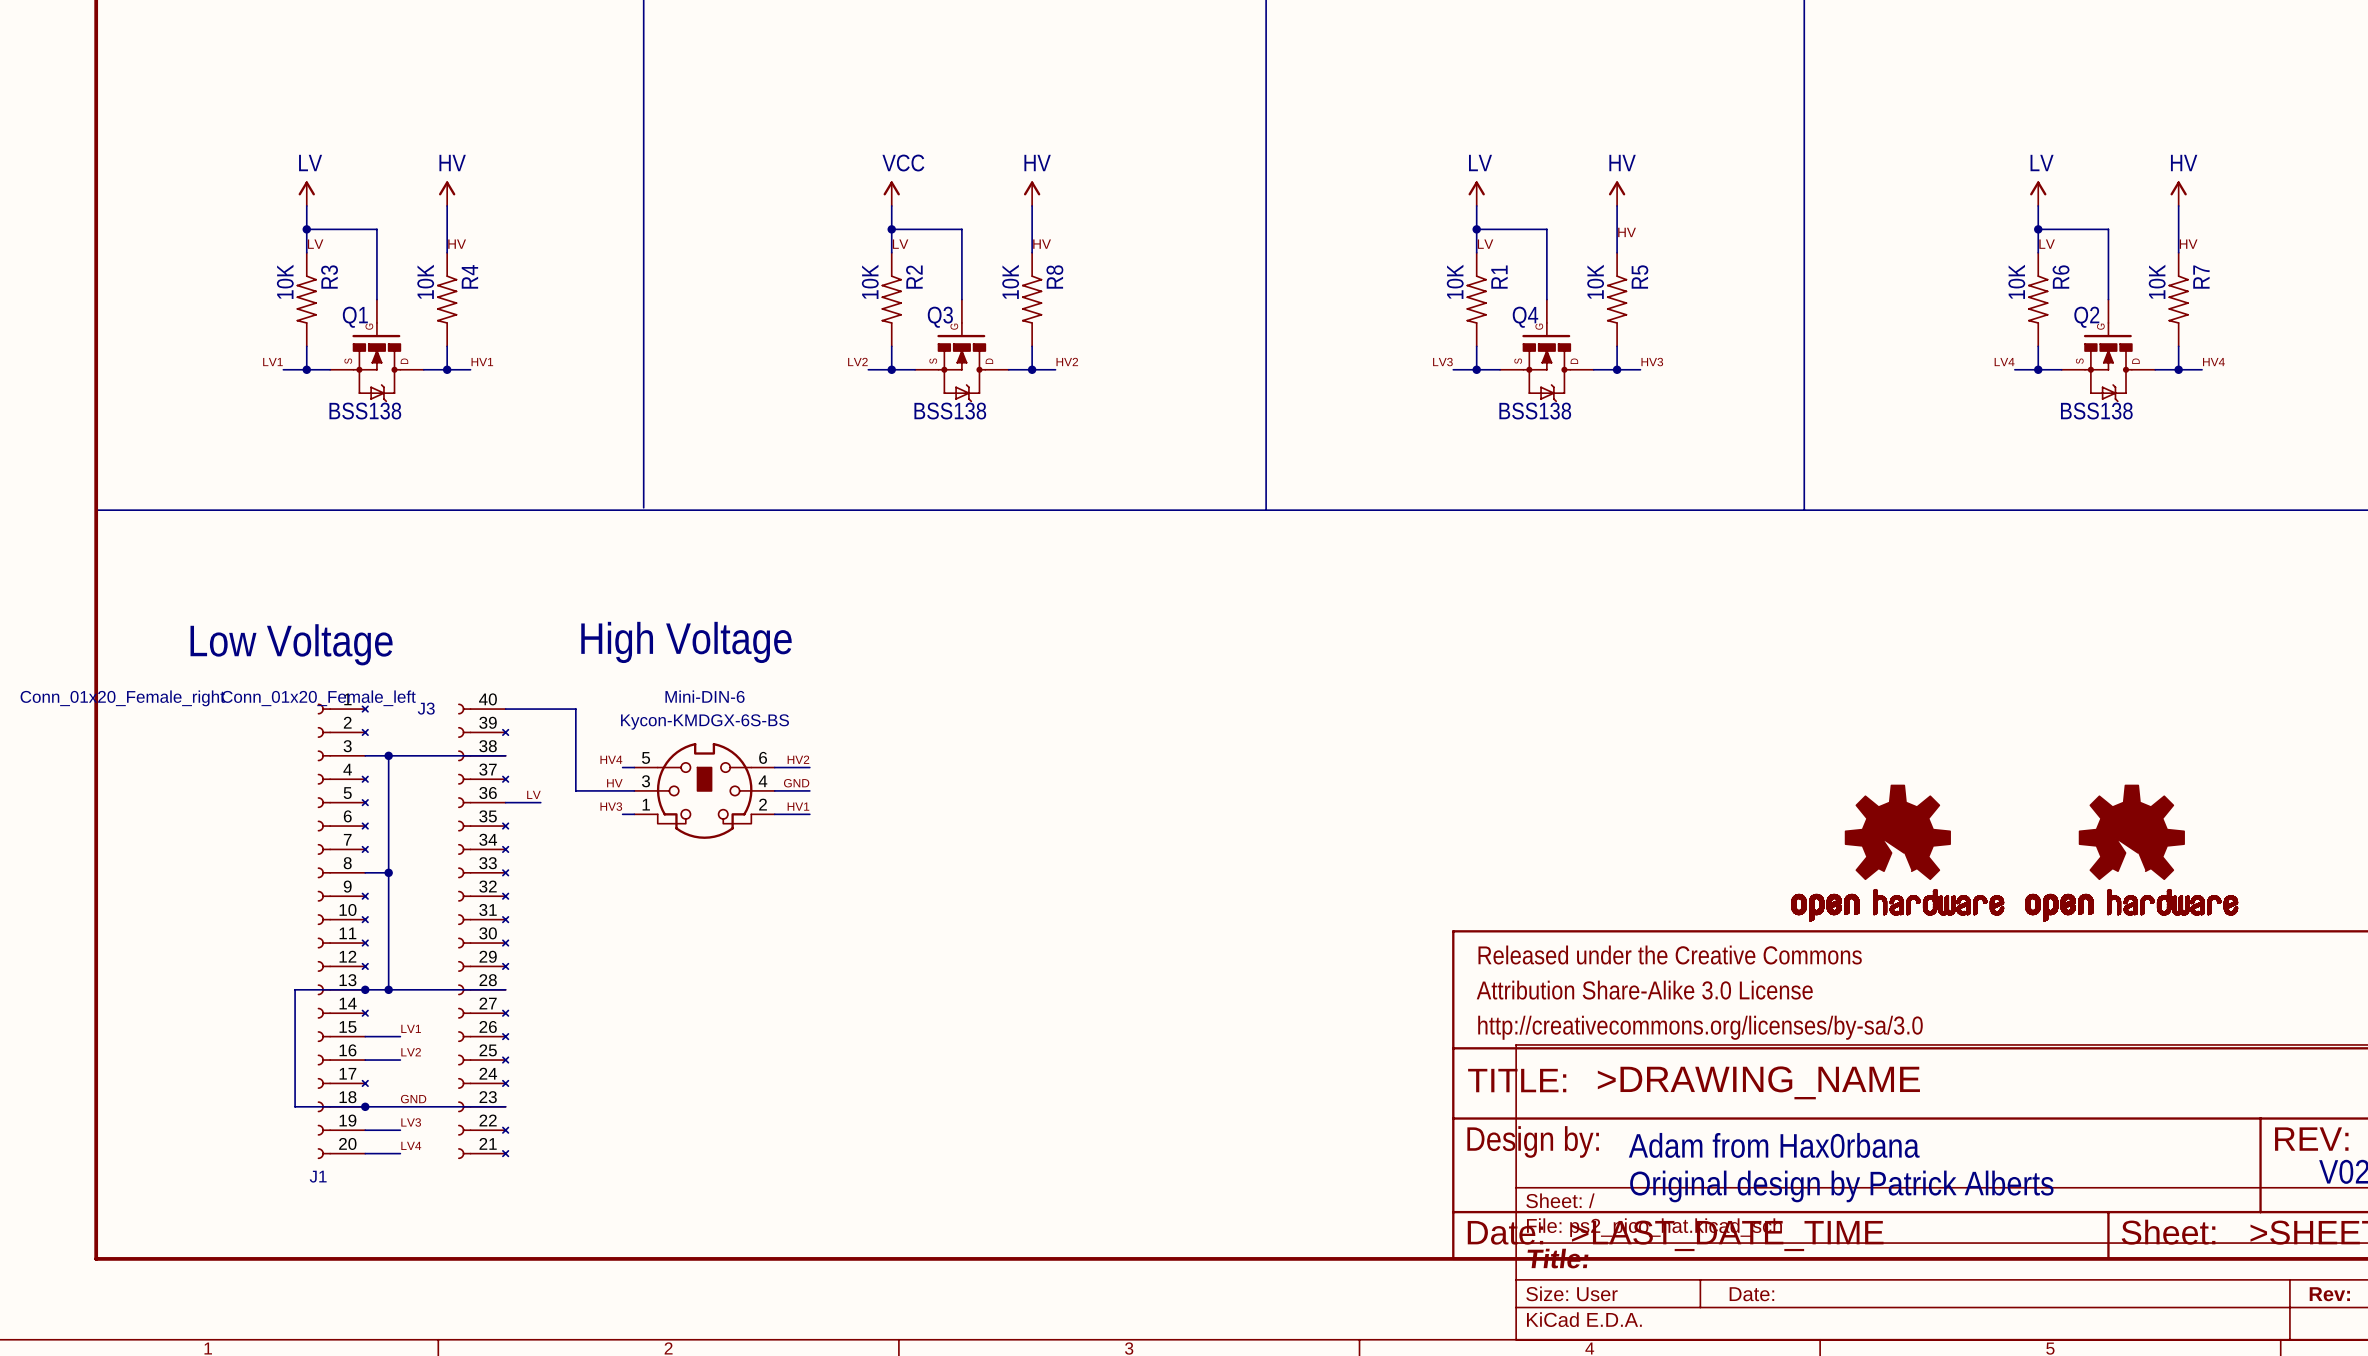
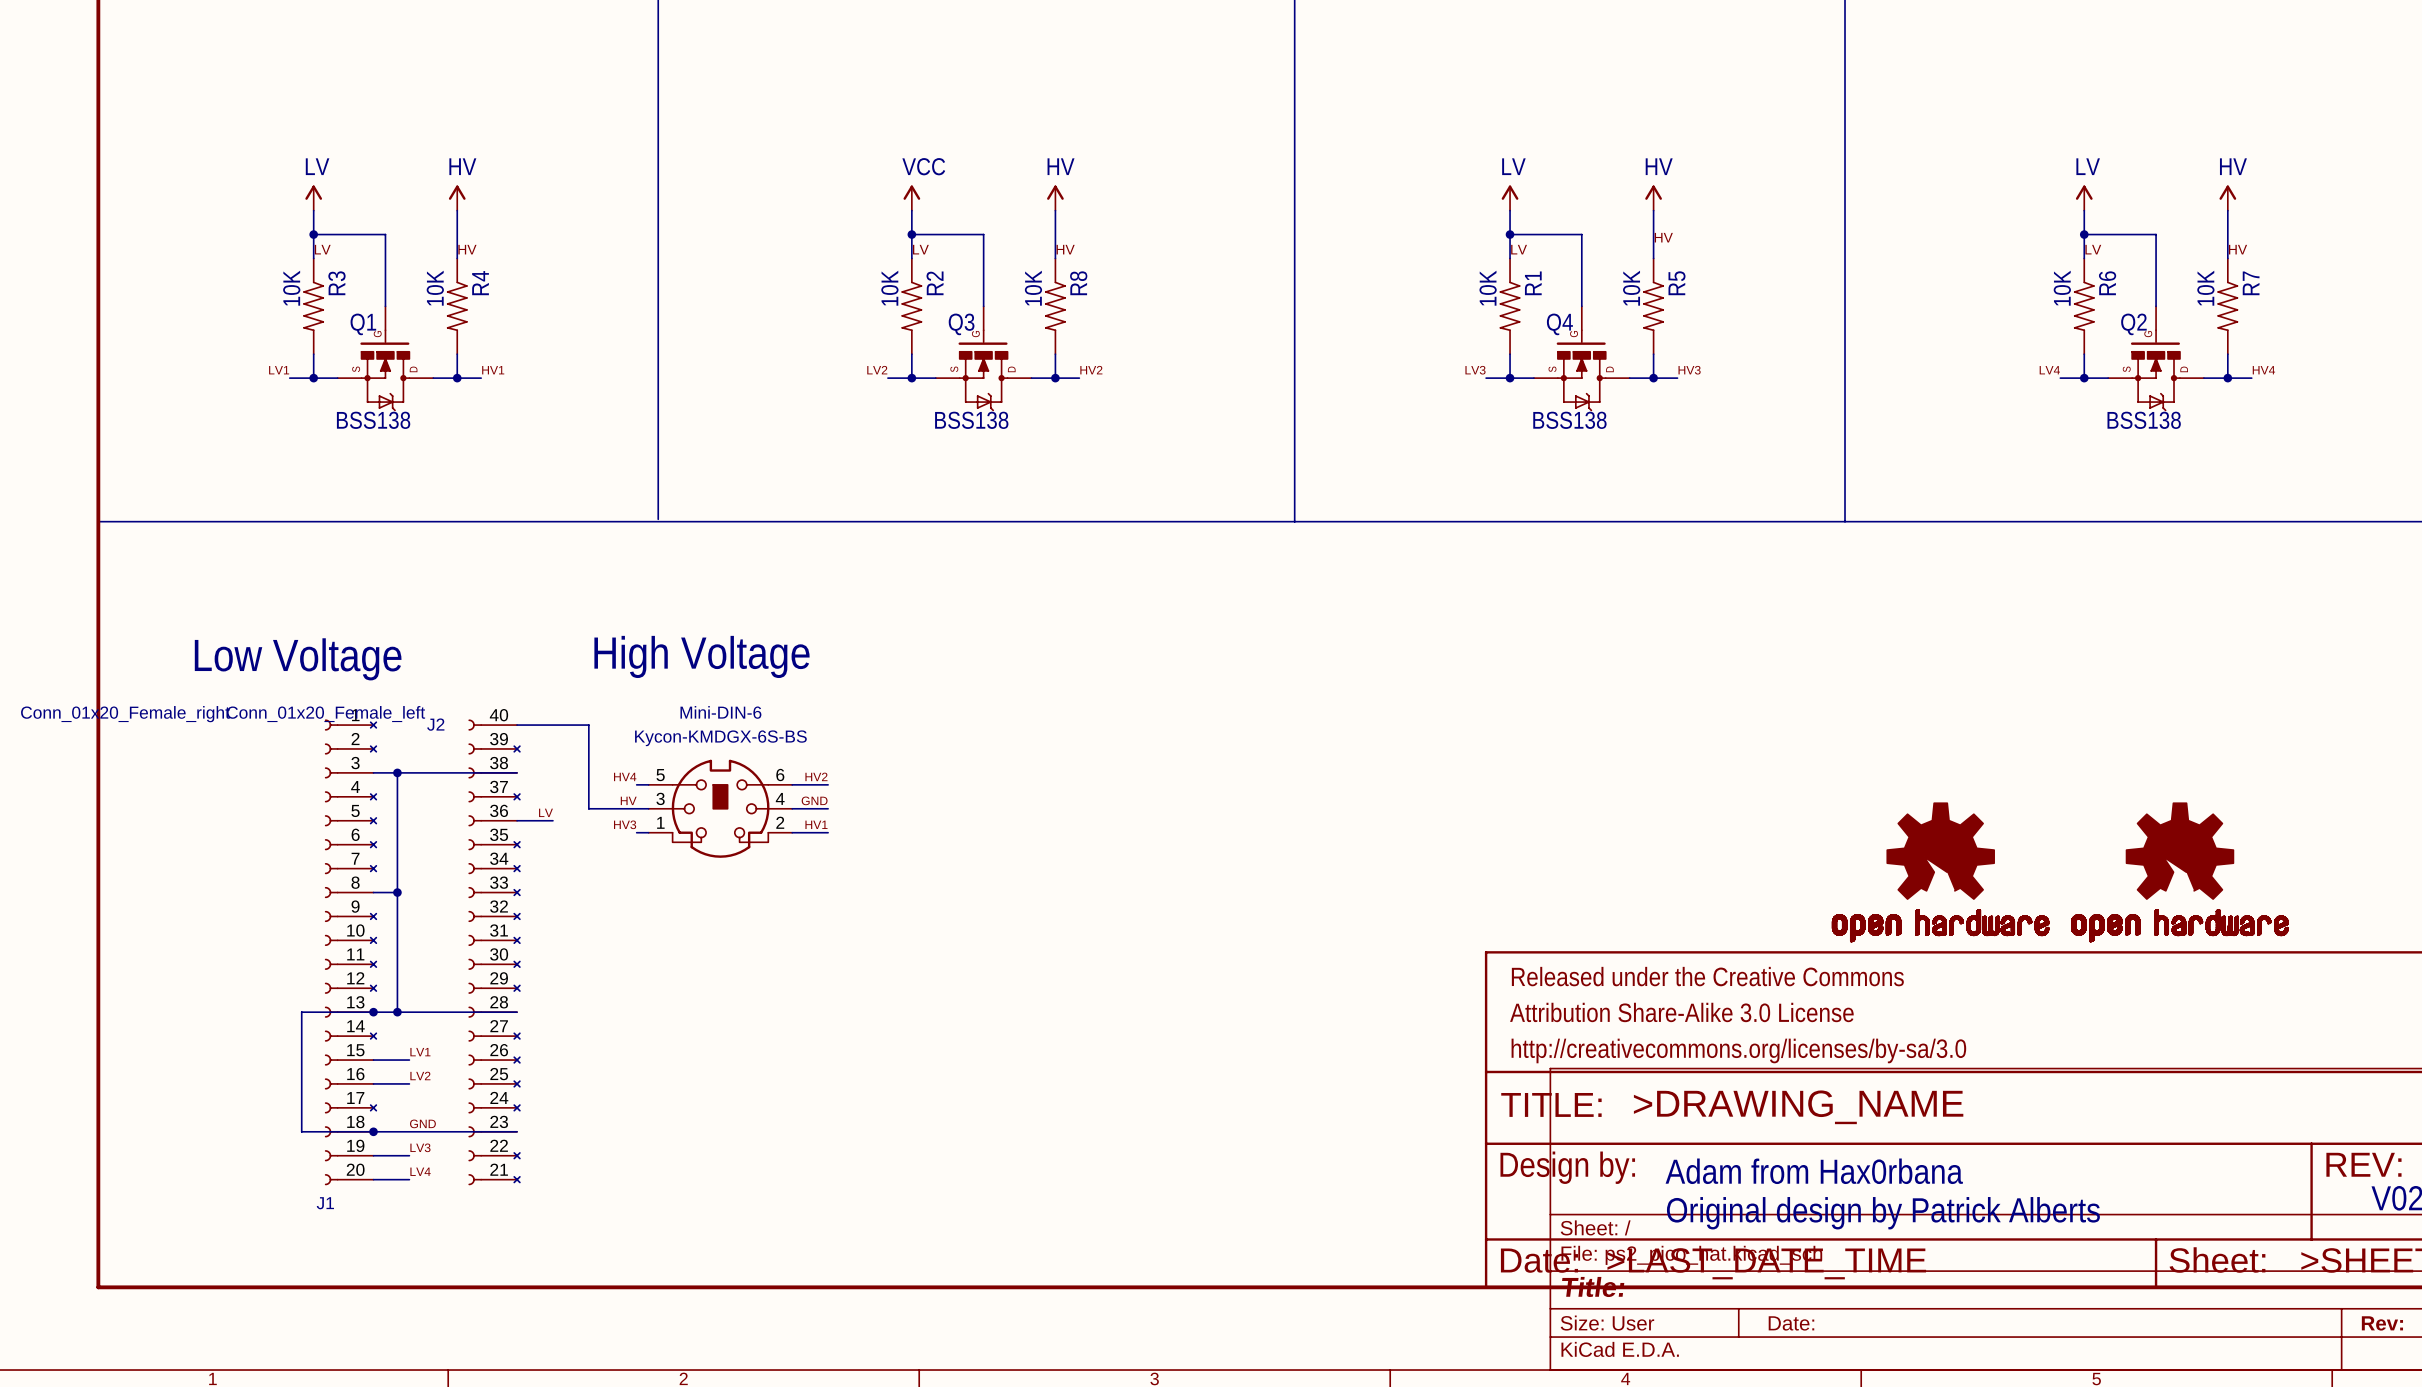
J3 name: J3 (426, 708) -> J2 (435, 724)

